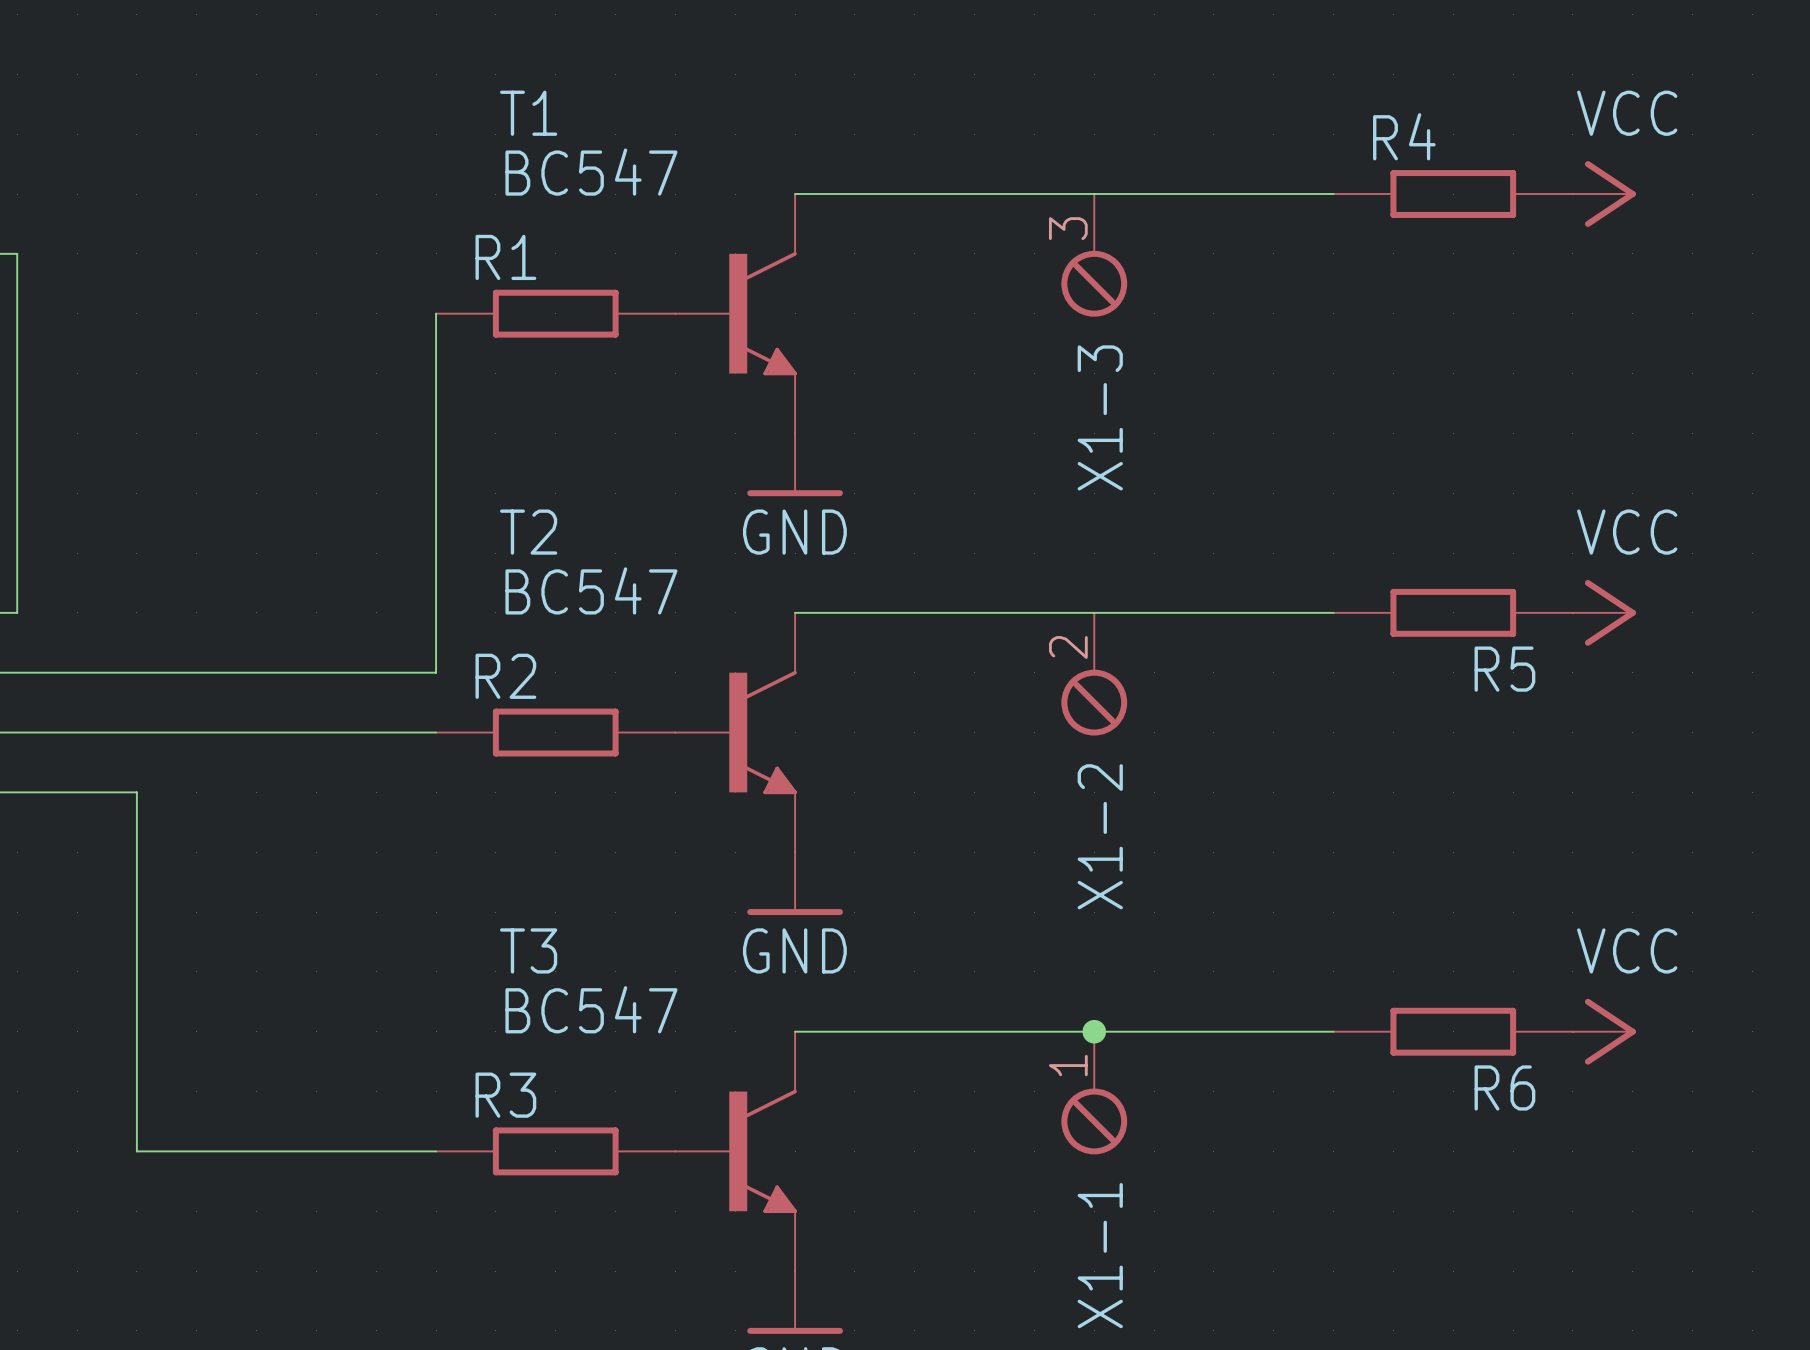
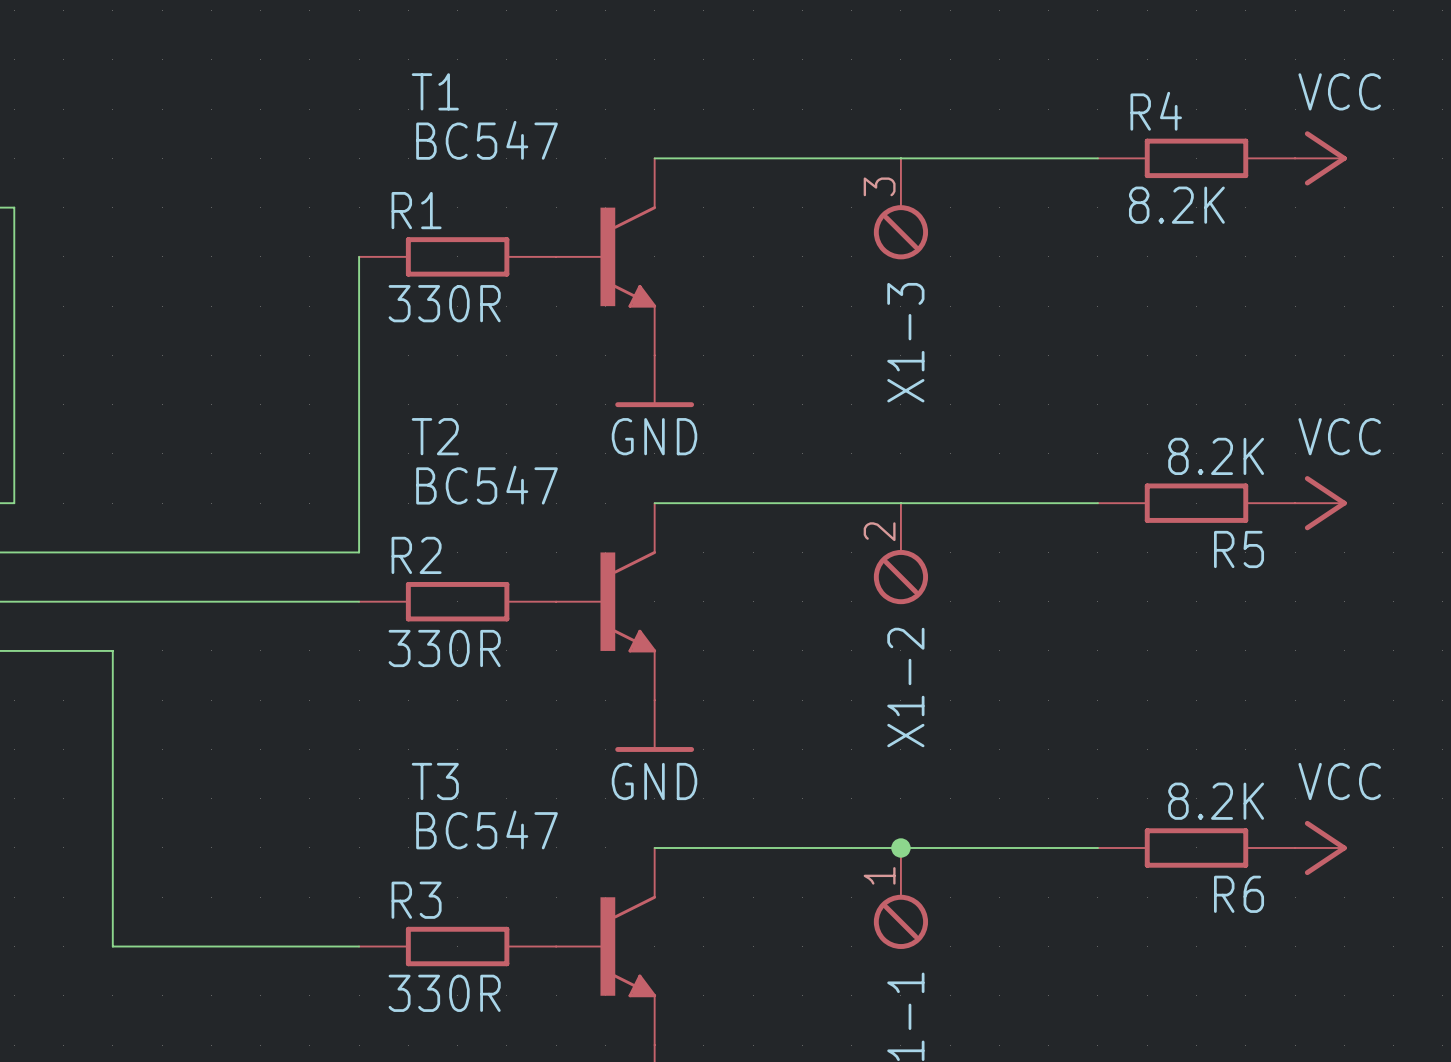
R4 value: none -> 8.2K (1176, 205)
R1 value: none -> 330R (444, 303)
R5 value: none -> 8.2K (1216, 456)
R2 value: none -> 330R (444, 648)
R6 value: none -> 8.2K (1216, 801)
R3 value: none -> 330R (444, 993)

